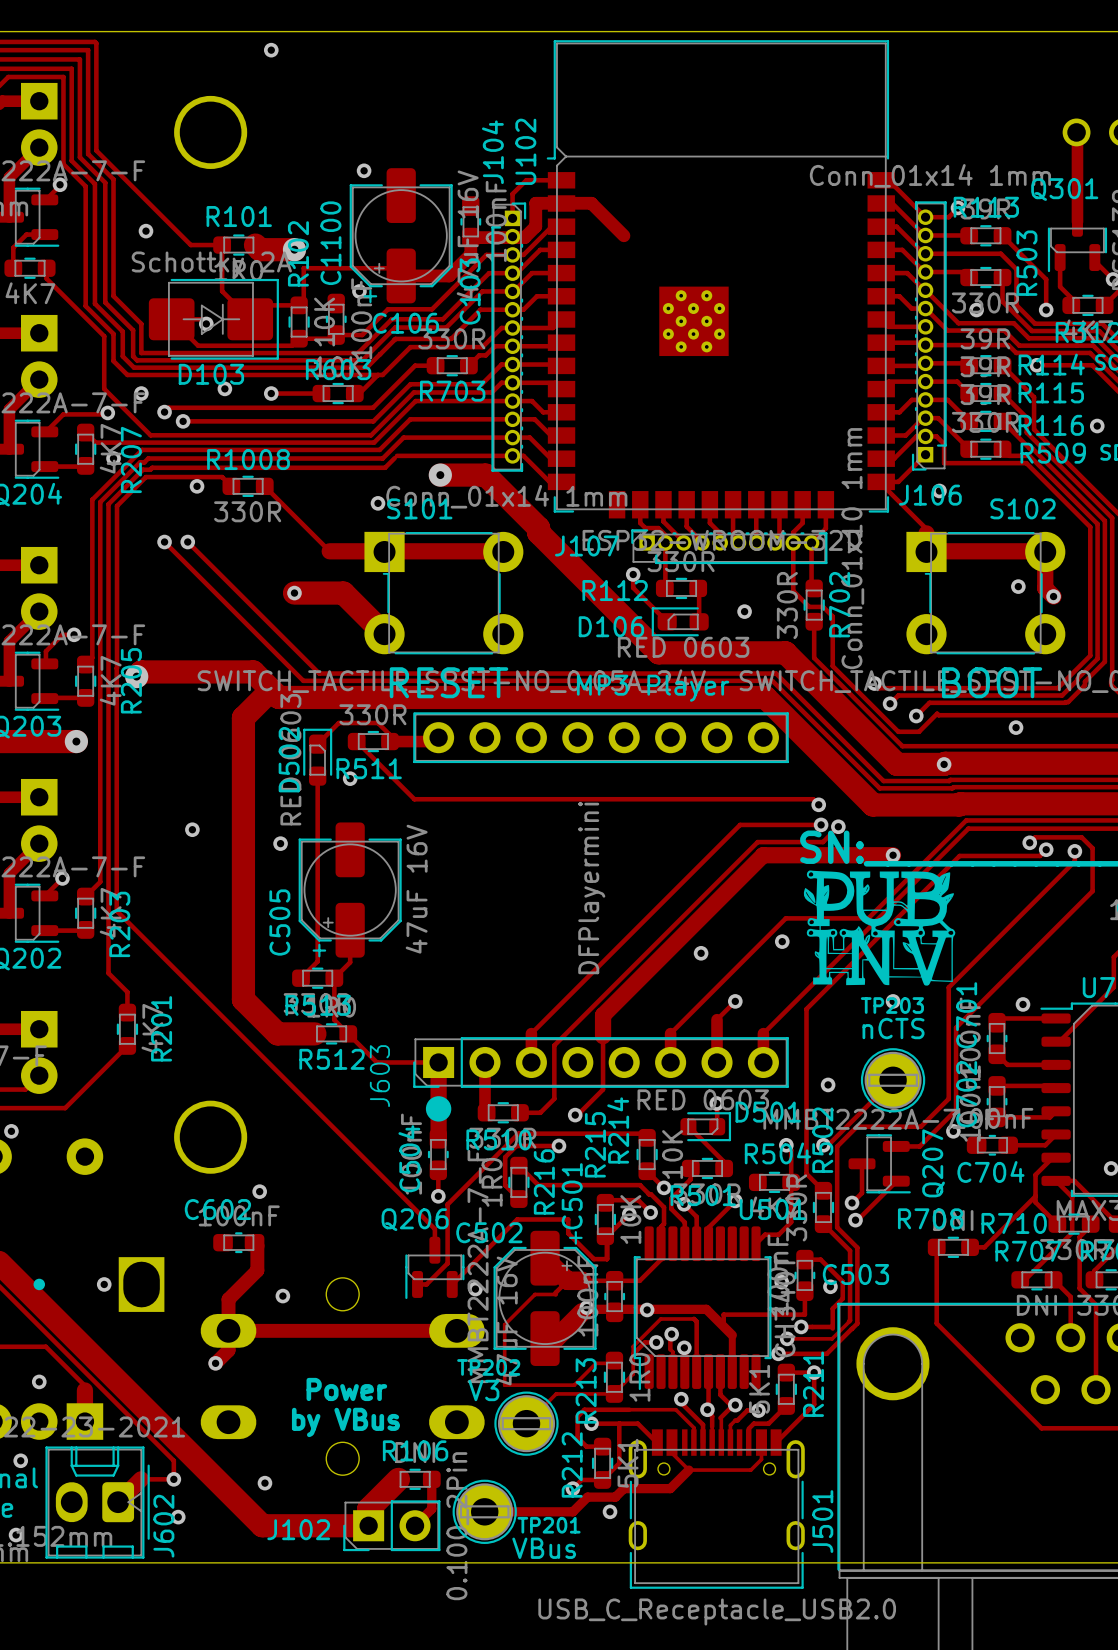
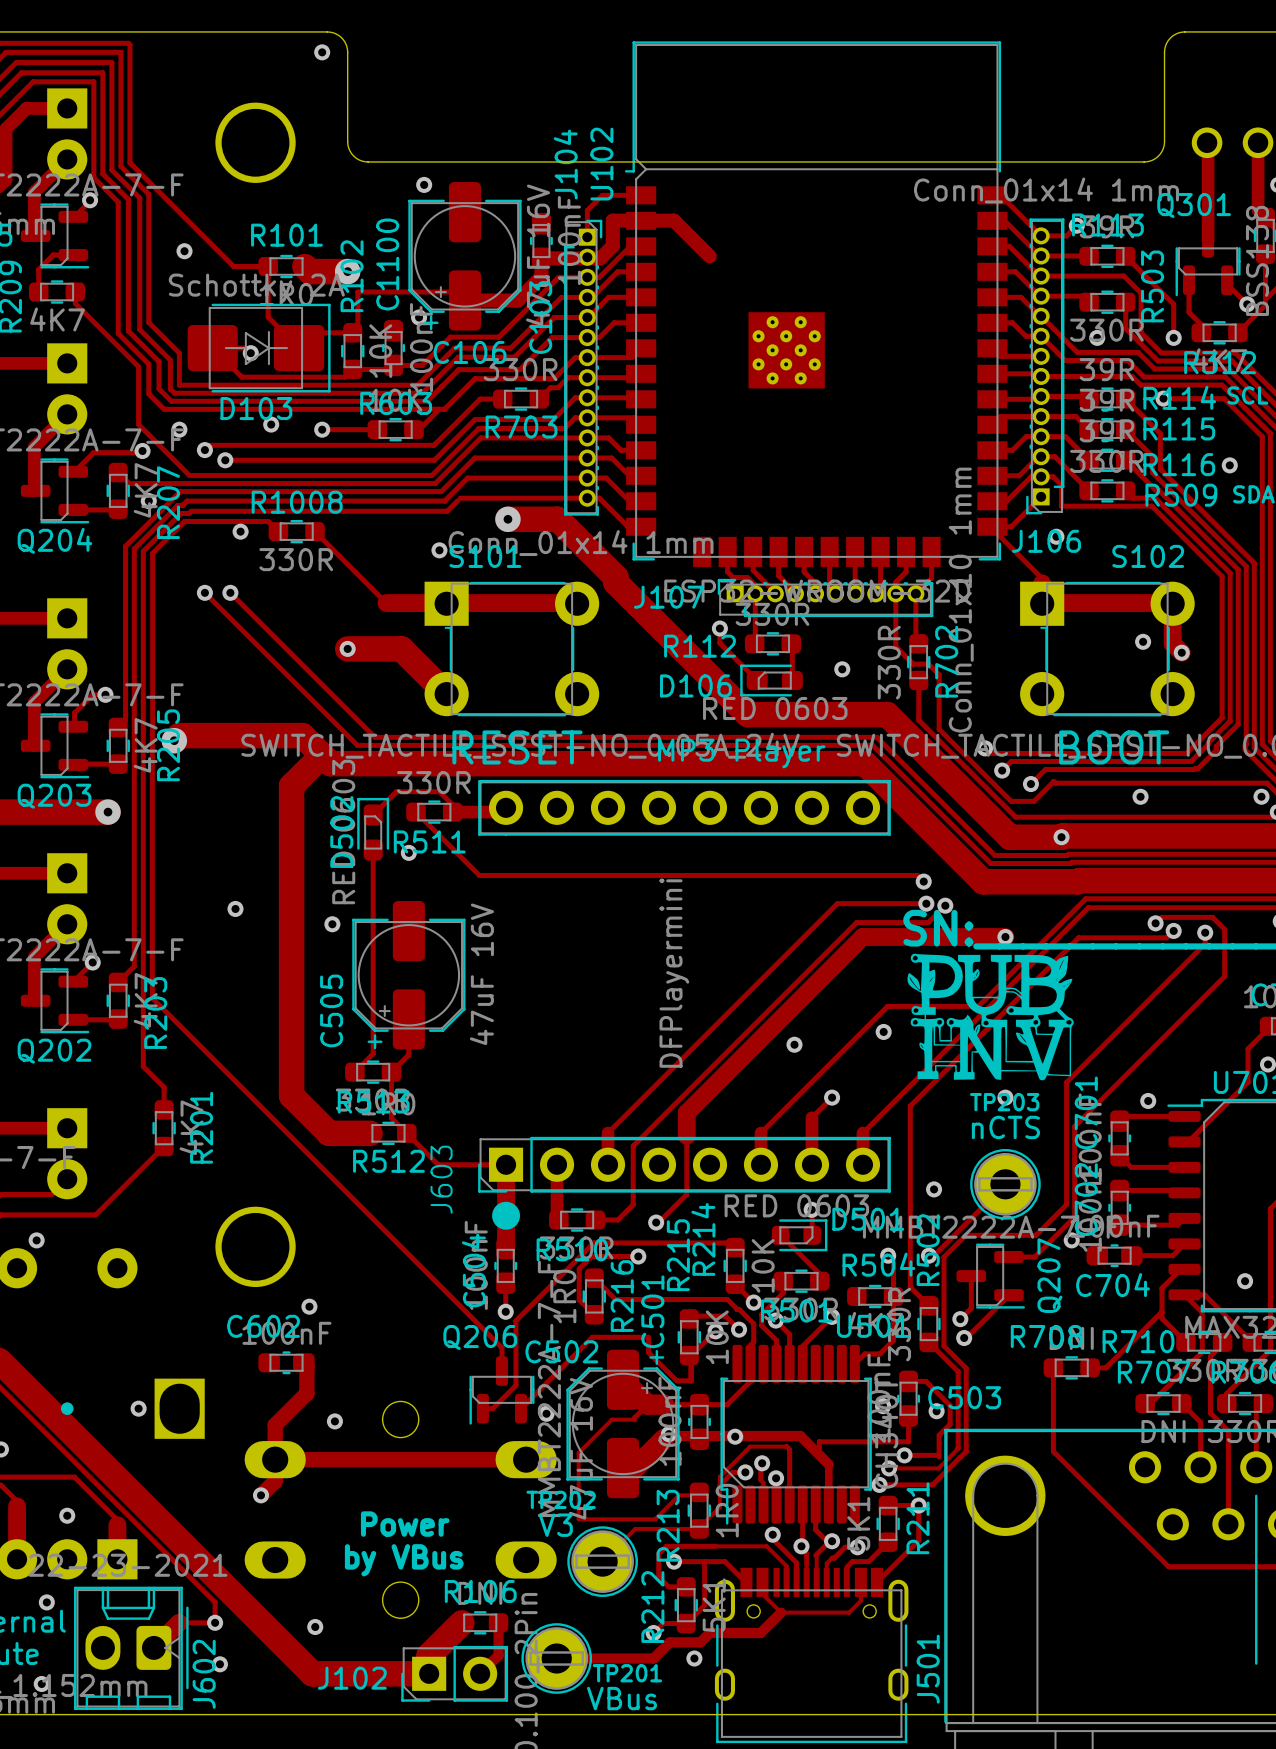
board edge: (275, 31) (1056, 31) -> (327, 31) (340, 36) (347, 47) (348, 148) (355, 157) (368, 161) (1146, 161) (1158, 156) (1164, 143) (1165, 45) (1172, 36) (1184, 31)

